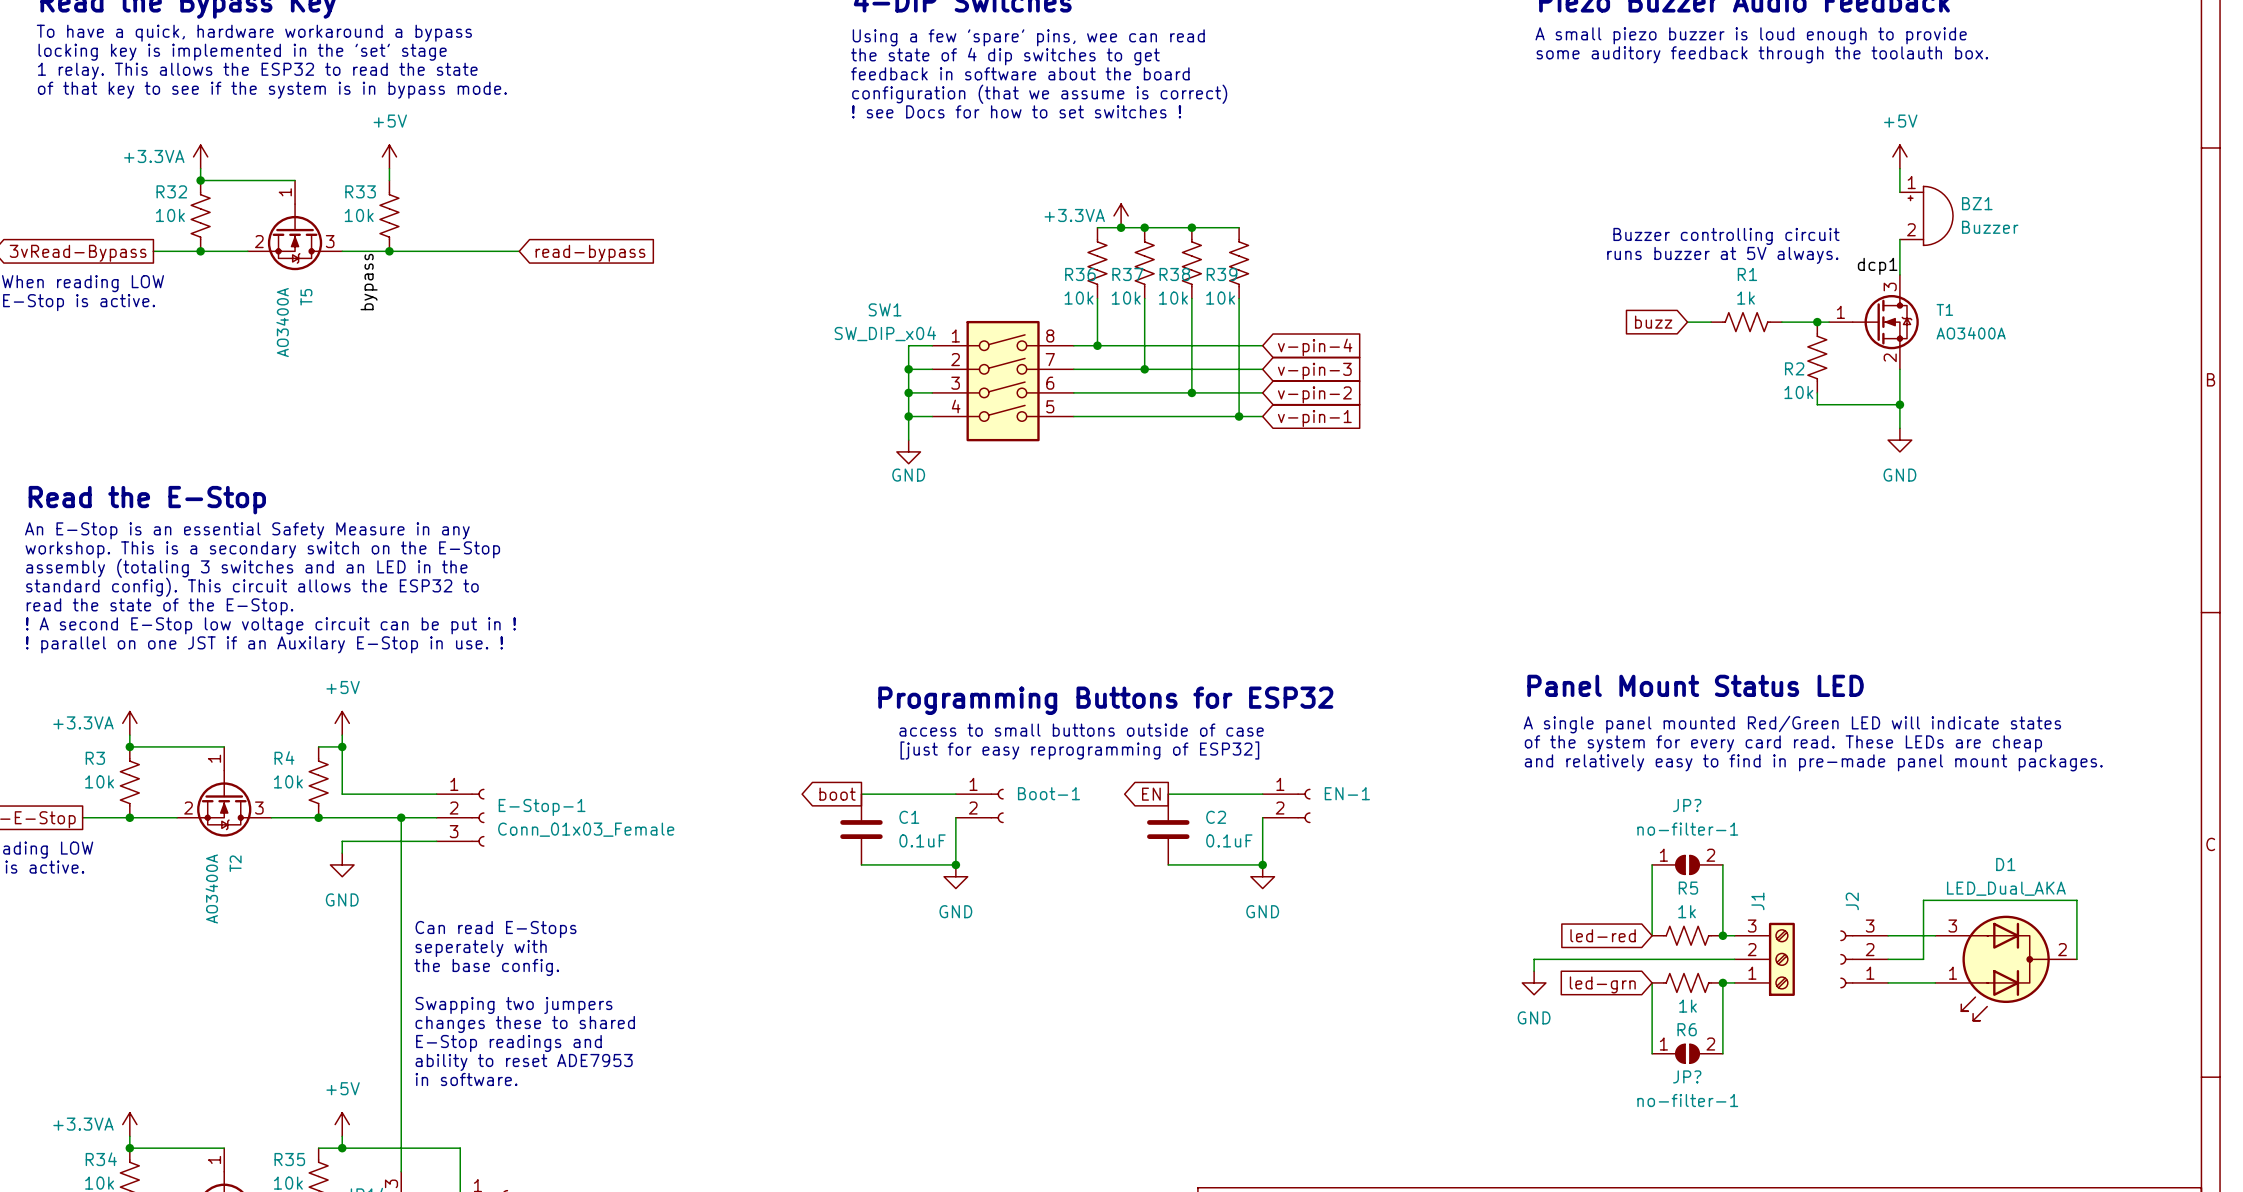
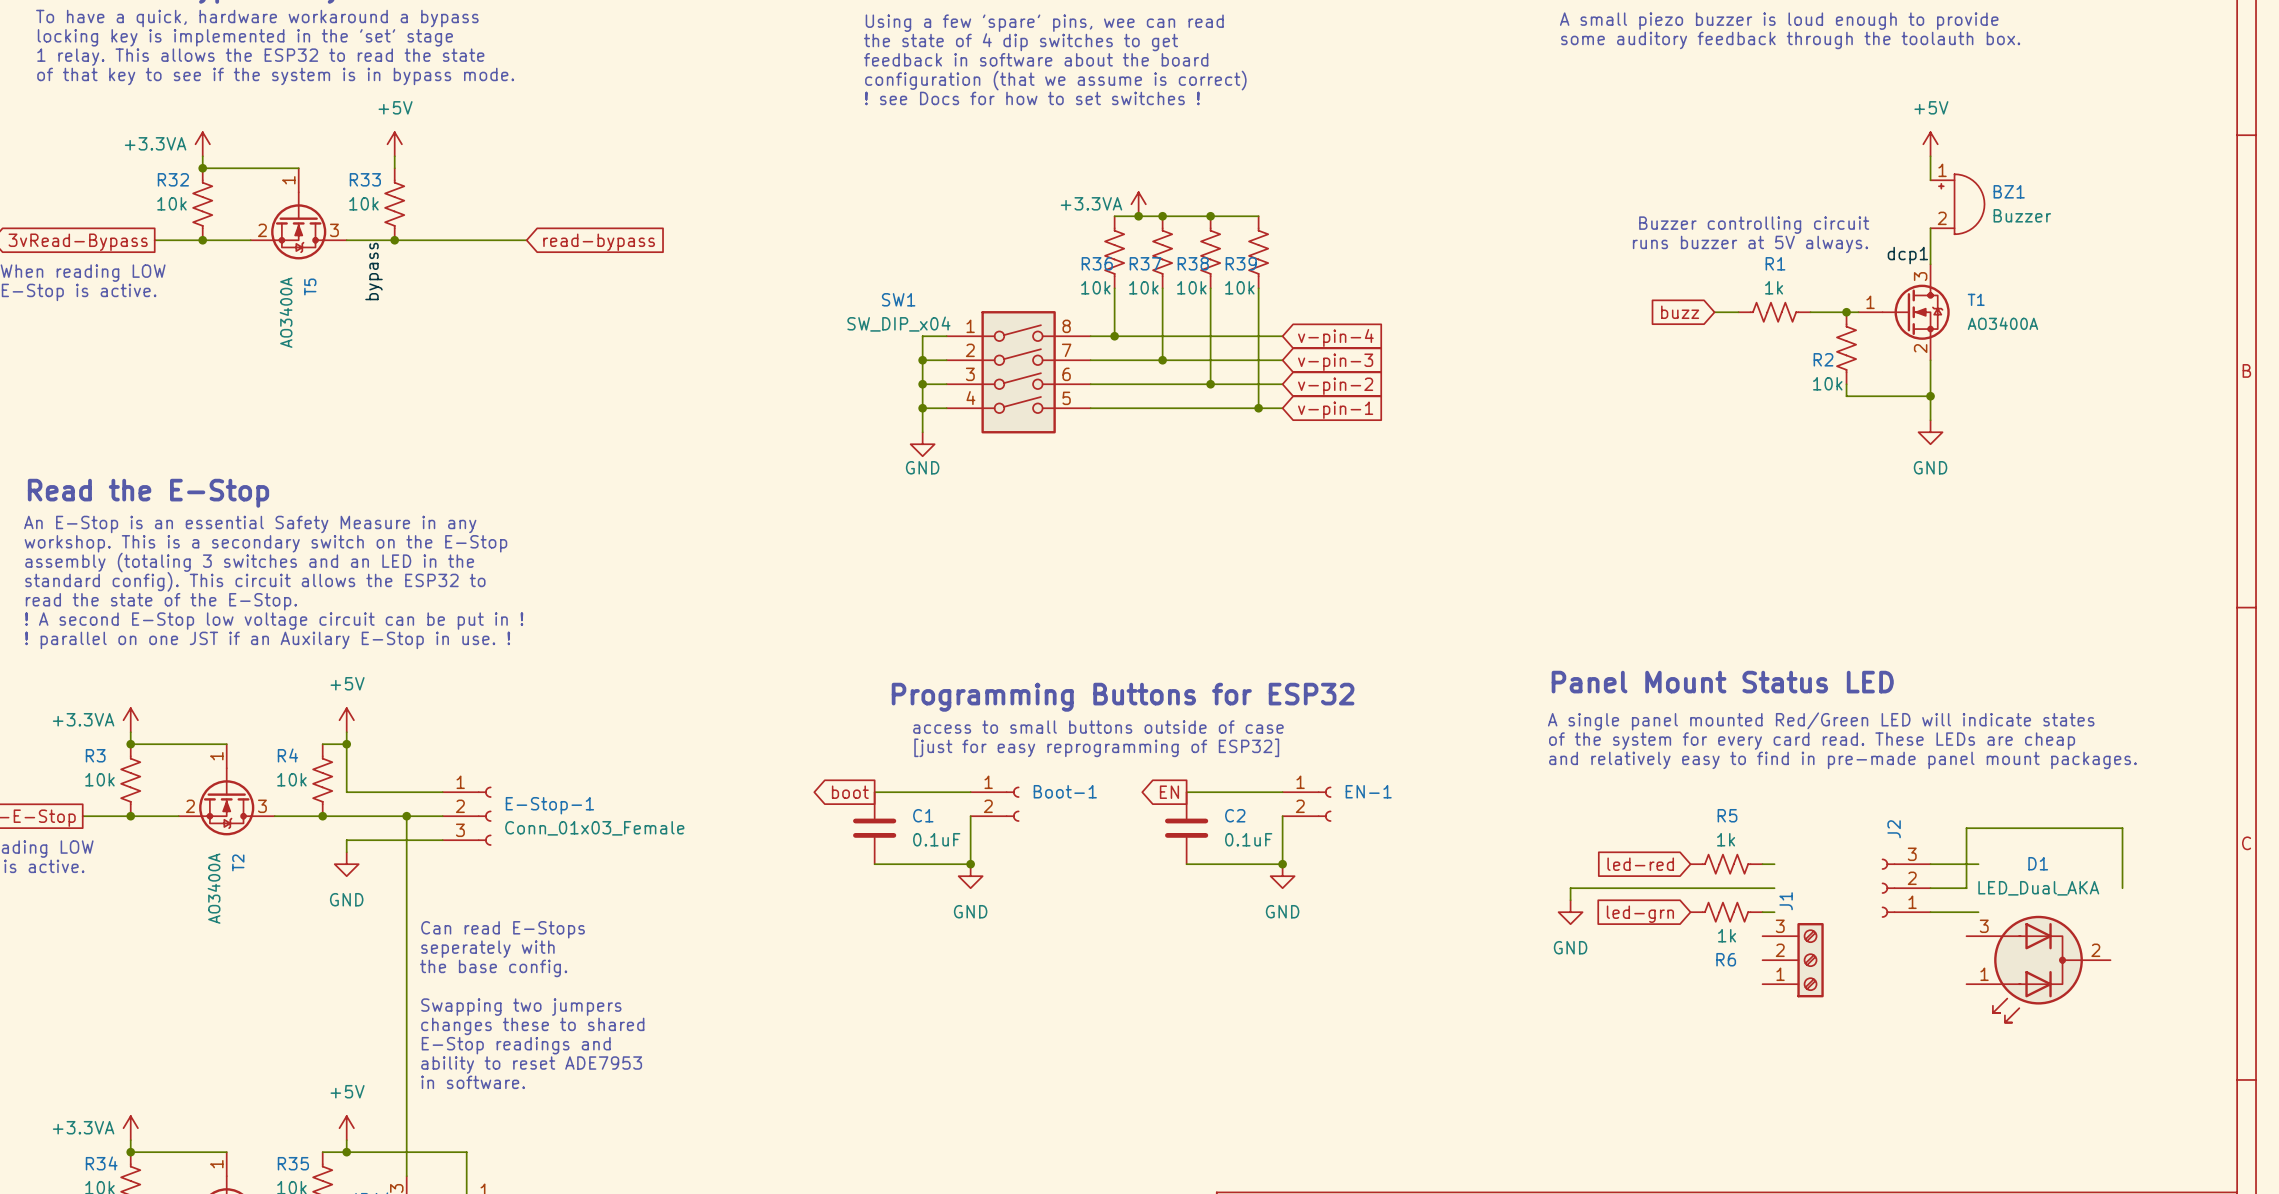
wire: (1652, 864) (1652, 935) -> none
JP?: no-filter-1 (1687, 864) -> none
wire: (1722, 864) (1722, 935) (1734, 935) -> none
wire: none -> (1762, 864) (1774, 864)
wire: none -> (1762, 912) (1774, 912)
global label position: led-red (1603, 935) -> led-red (1640, 864)
R5 position: (1687, 935) -> (1726, 864)
junction: (1722, 935) -> none
wire: (1888, 935) (1935, 935) -> (1930, 864) (1978, 864)
wire: (1734, 959) (1534, 959) (1534, 971) -> (1774, 888) (1570, 888) (1570, 900)
J2 position: (1864, 959) -> (1906, 888)
wire: (1888, 959) (1923, 959) (1923, 900) (2076, 900) (2076, 959) -> (1930, 888) (1966, 888) (1966, 828) (2122, 828) (2122, 888)
power symbol position: GND (1534, 982) -> GND (1570, 912)
wire: (1652, 982) (1652, 1053) -> none
R6 position: (1687, 982) -> (1726, 912)
junction: (1722, 982) -> none
wire: (1734, 982) (1722, 982) (1722, 1053) -> none
wire: (1888, 982) (1935, 982) -> (1930, 912) (1978, 912)
global label position: led-grn (1602, 984) -> led-grn (1640, 914)
JP?: no-filter-1 (1687, 1053) -> none

